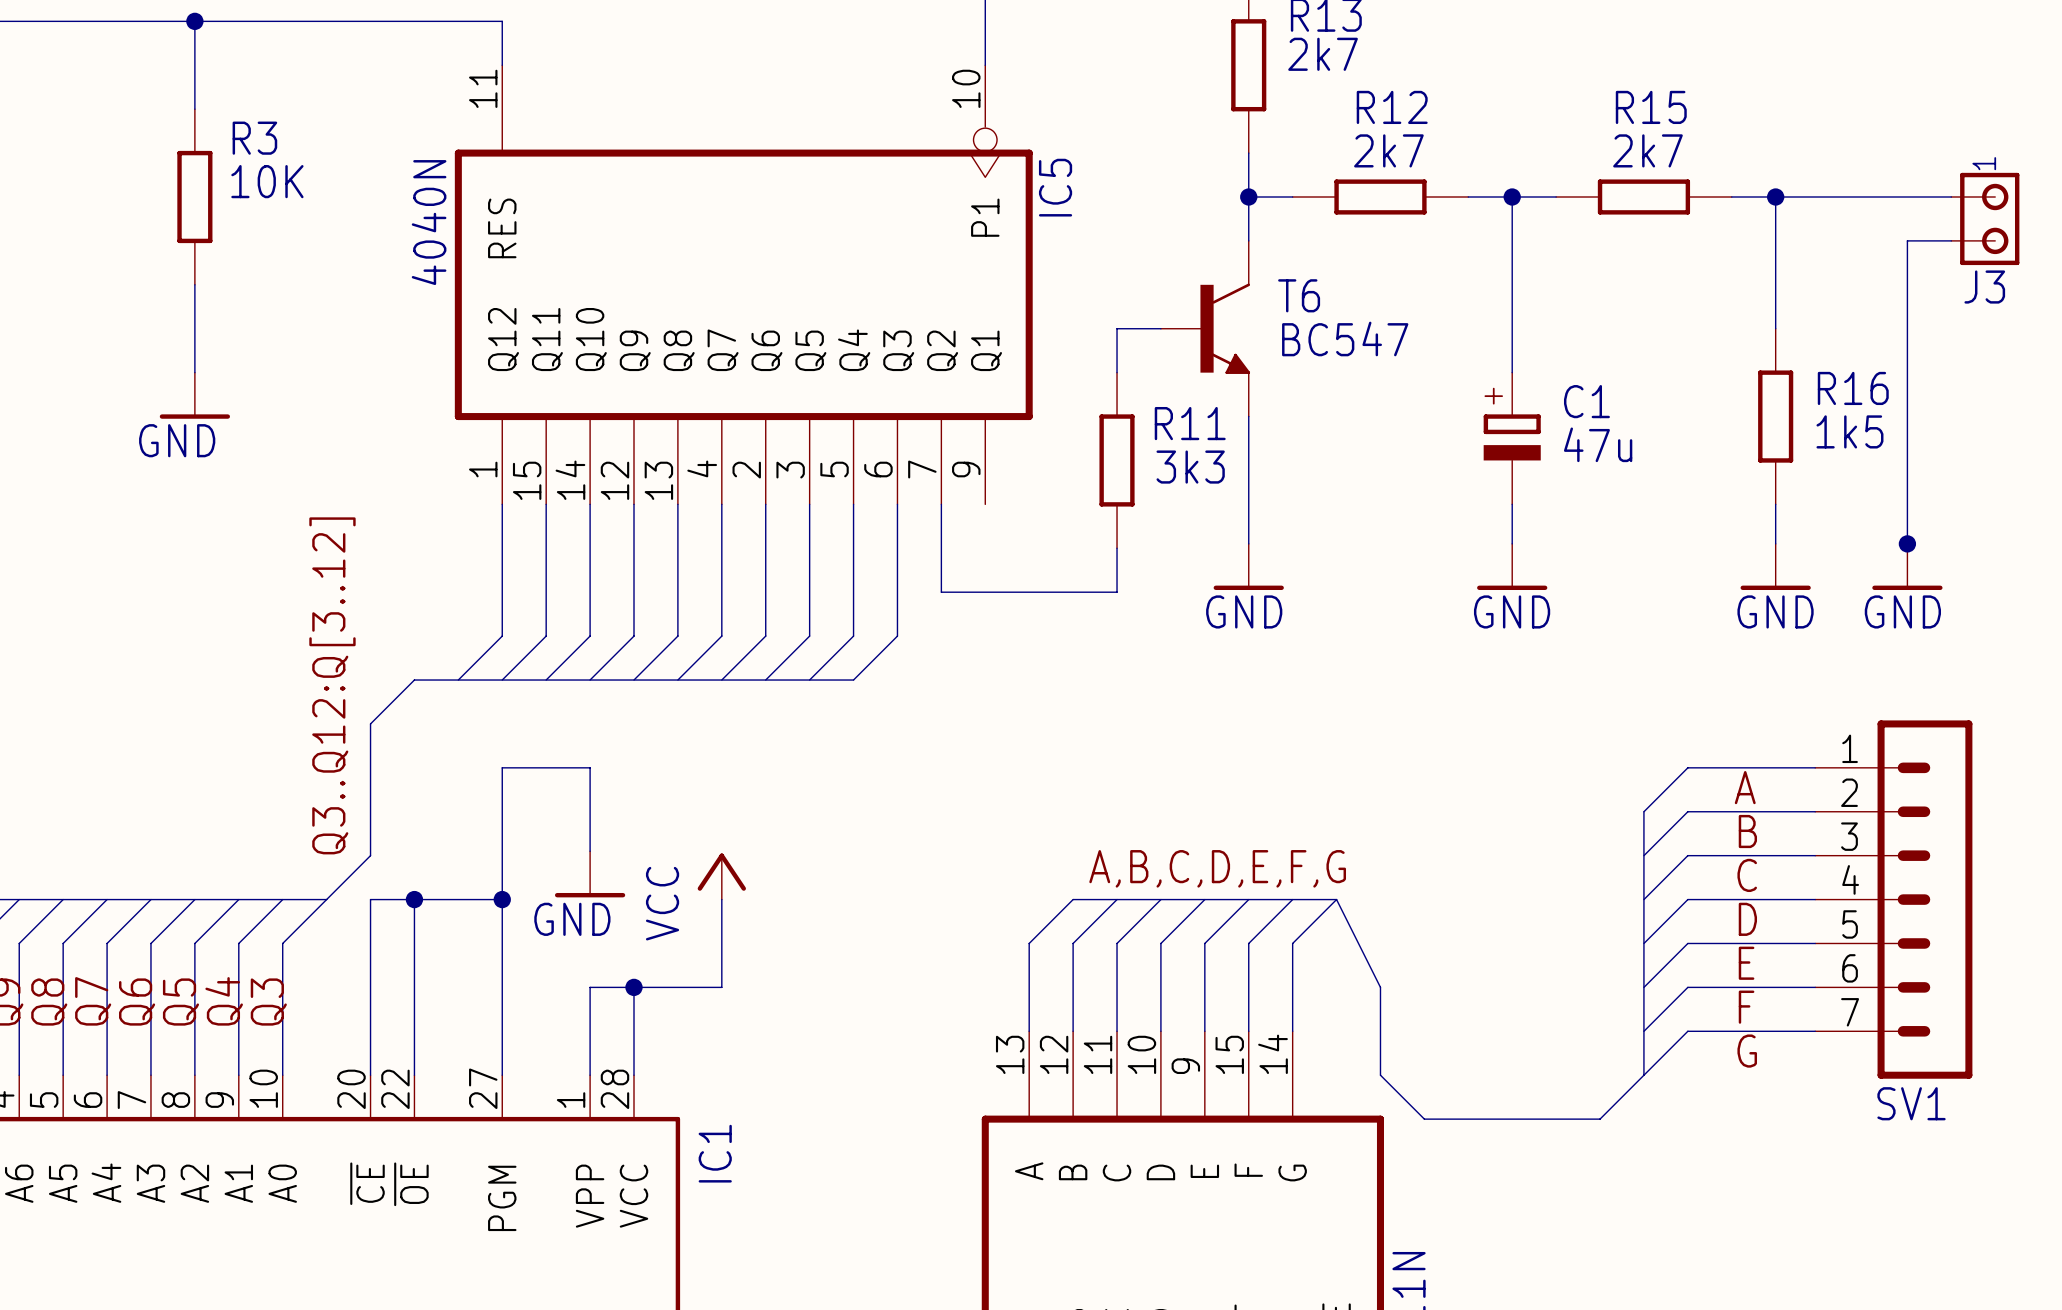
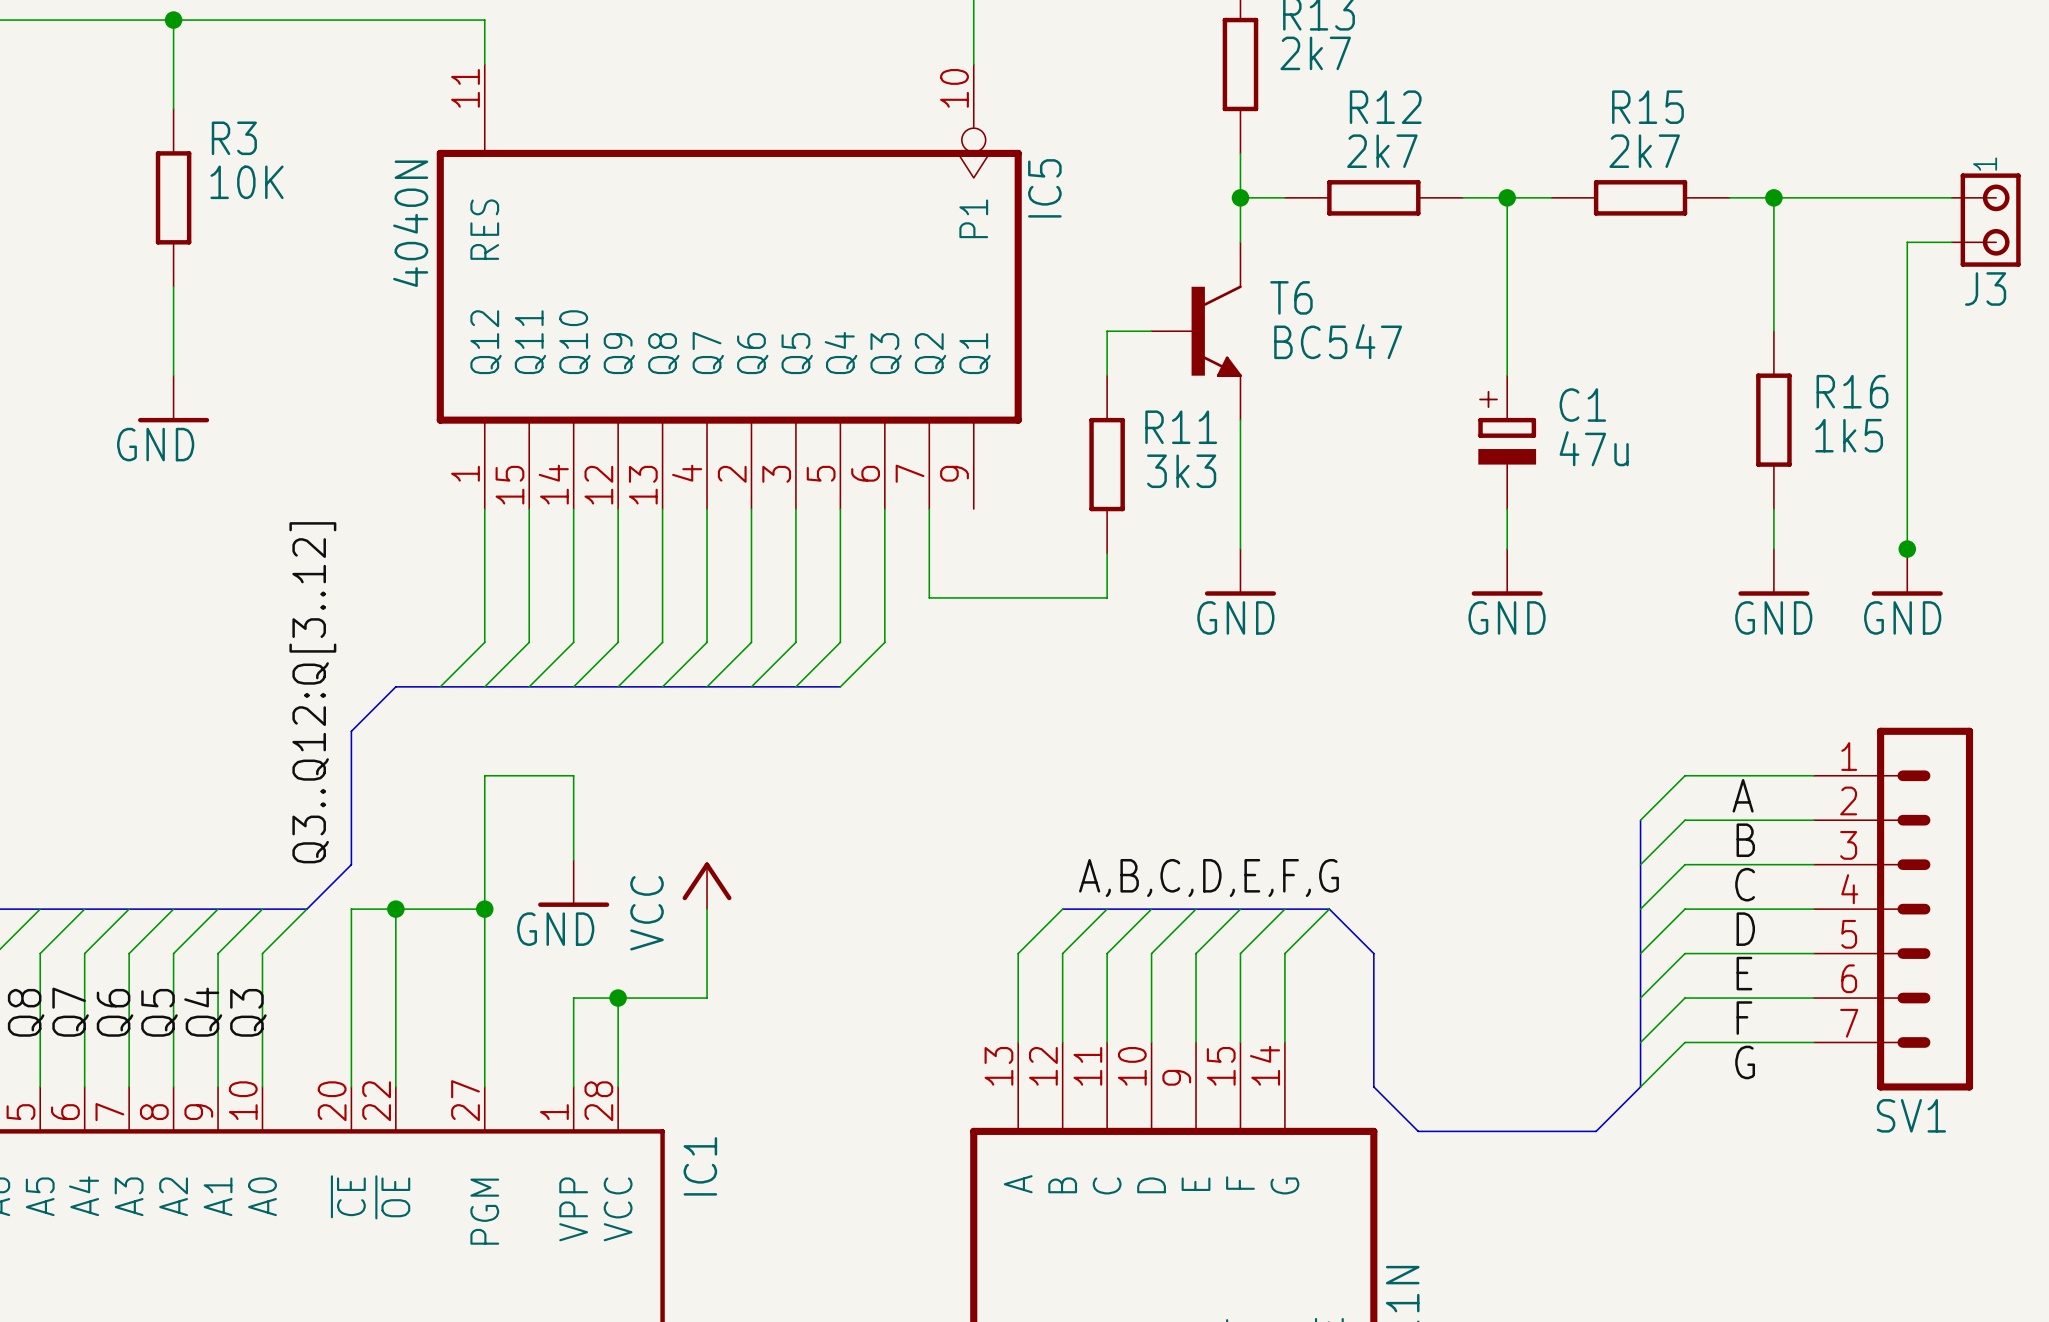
bus: (1336, 899) (1380, 987) -> (1329, 909) (1373, 953) (1373, 998)

